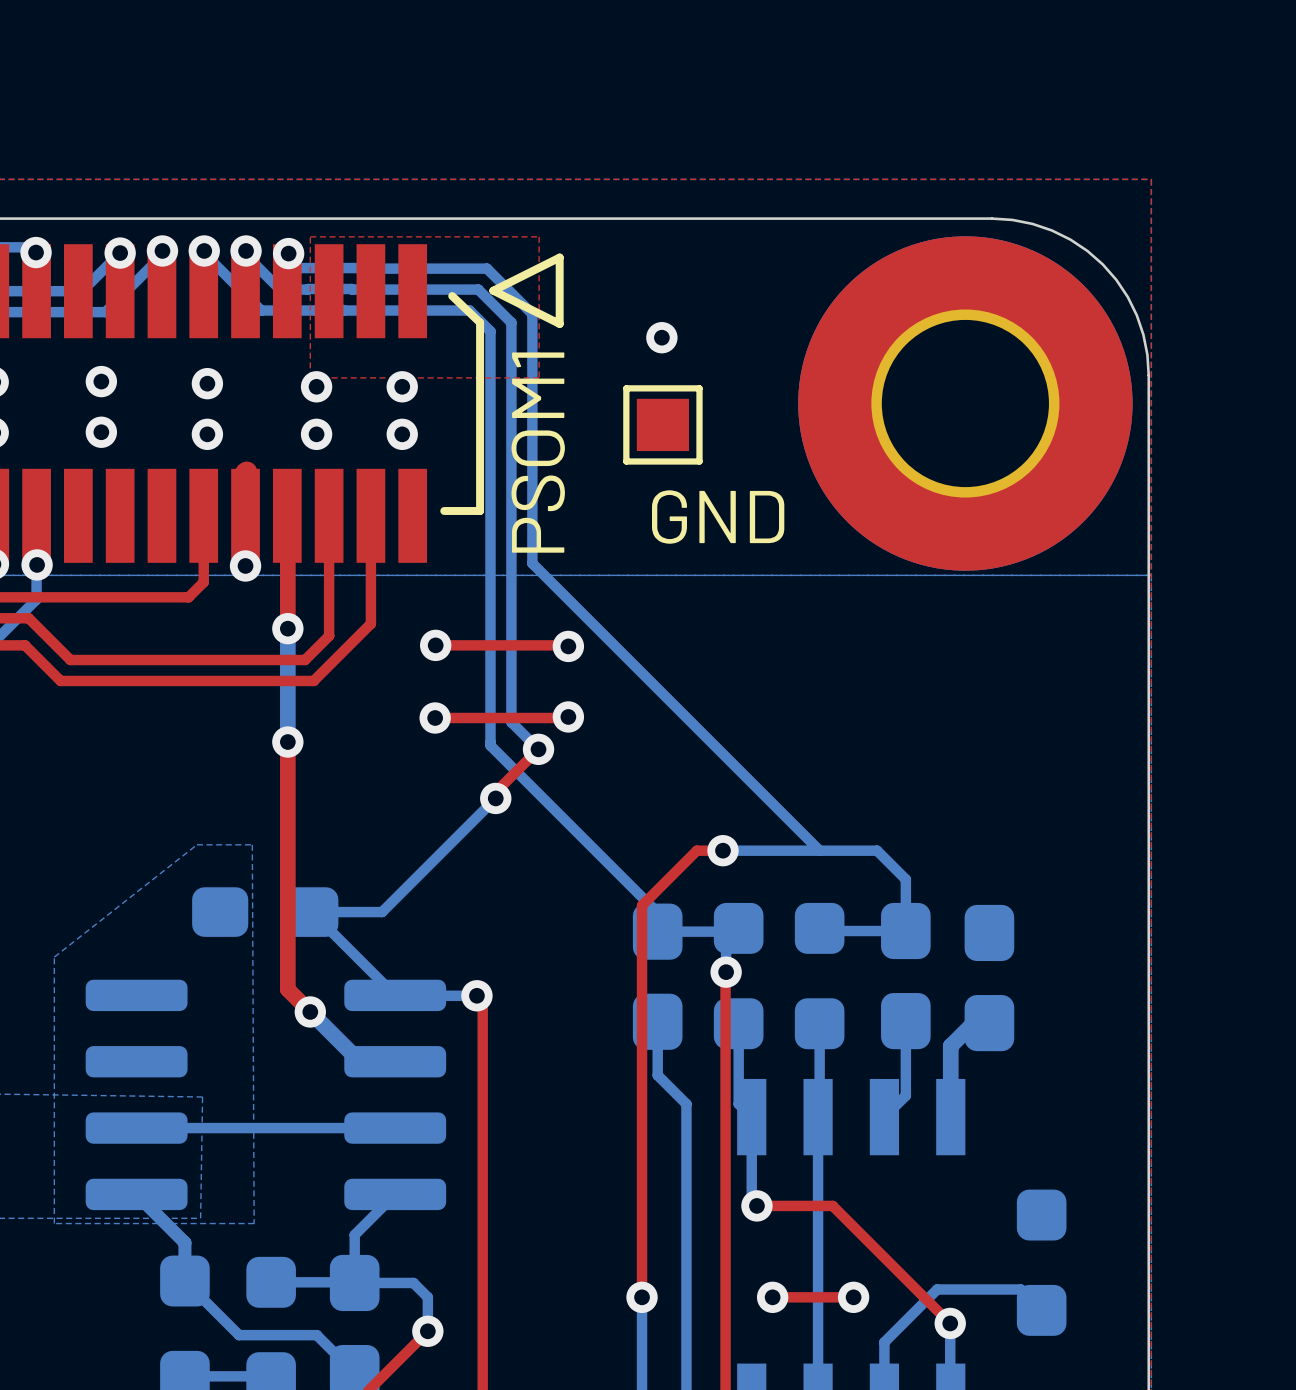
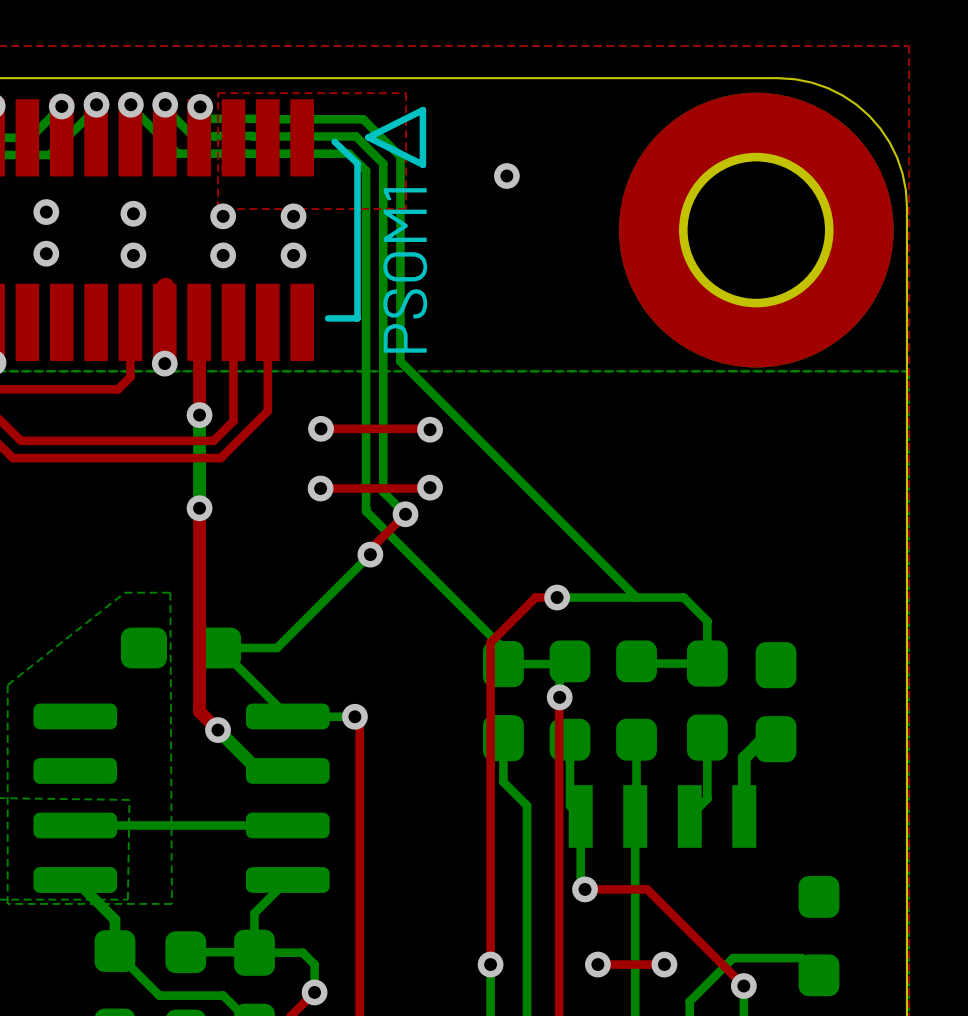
GND: (662, 424) -> none

